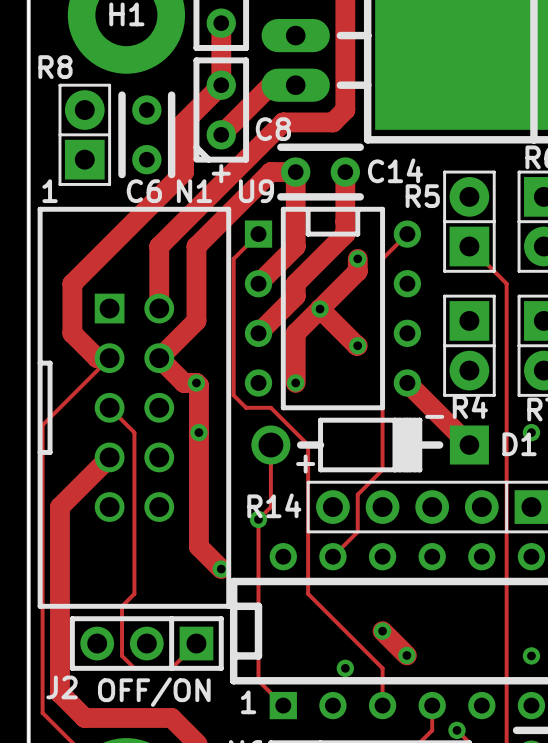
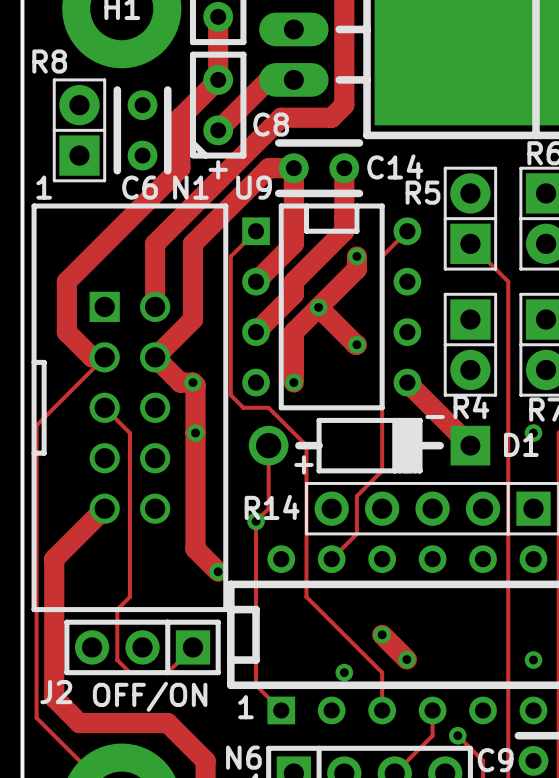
track: (109, 457) (59, 507) (59, 556) -> (104, 508) (54, 559)

